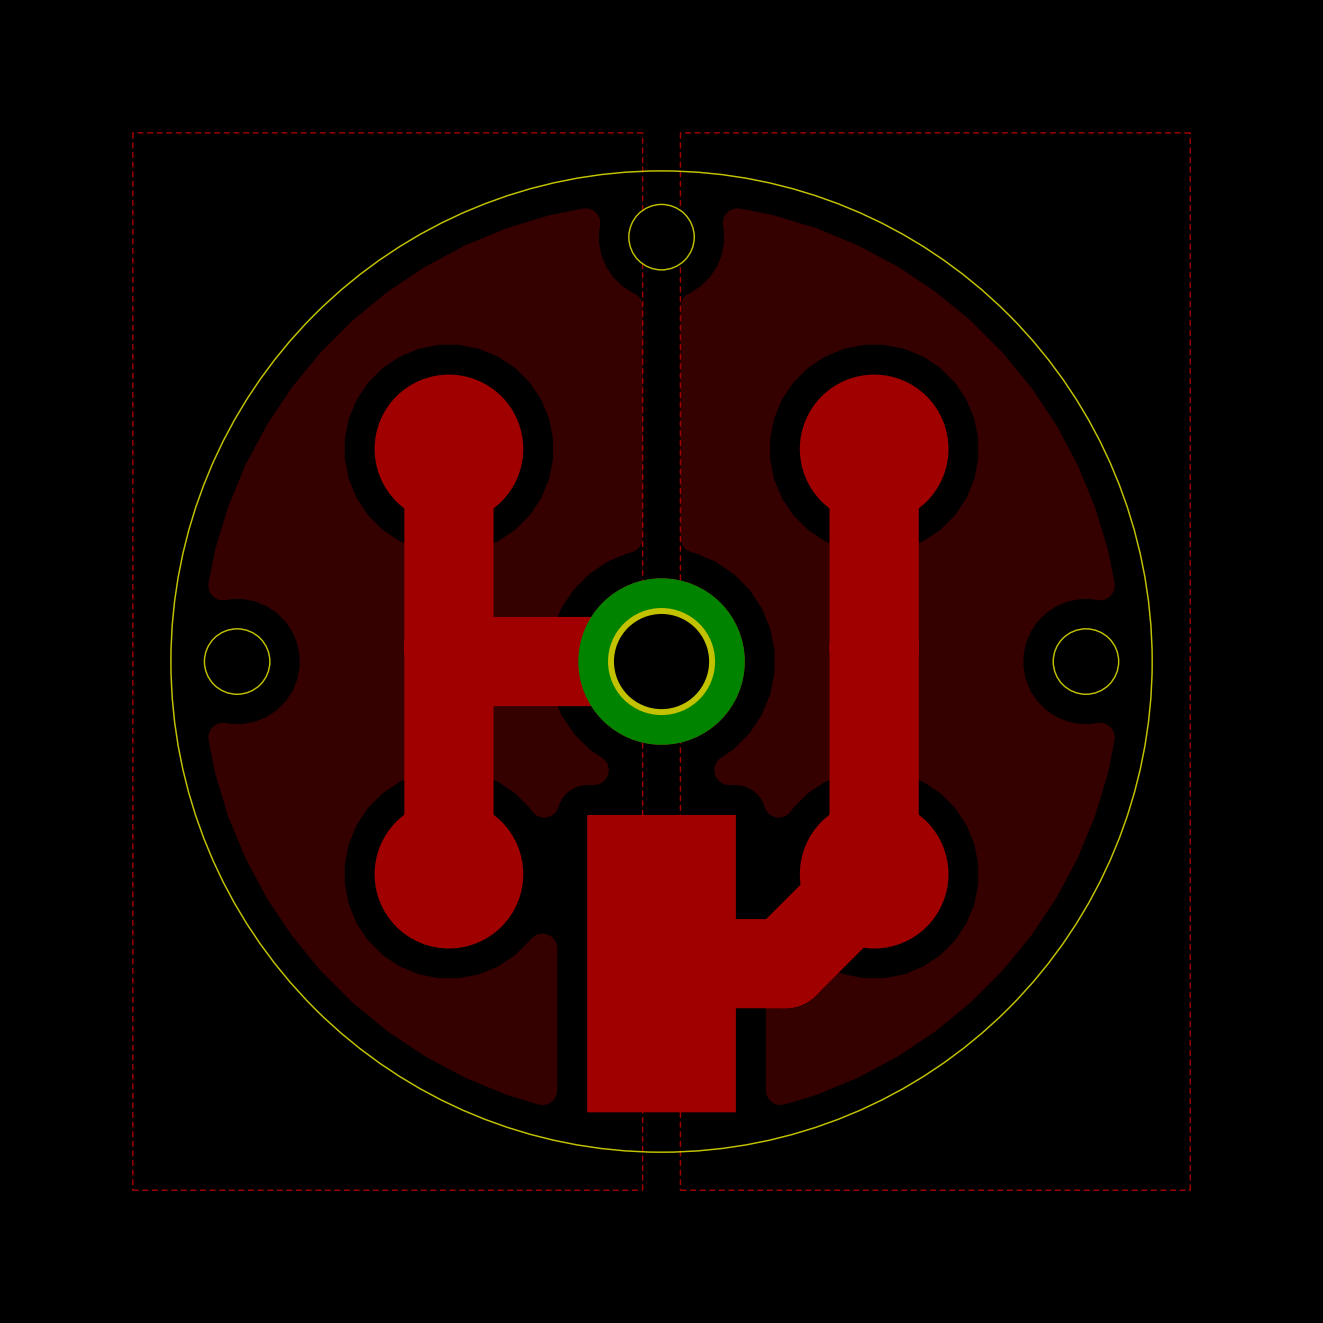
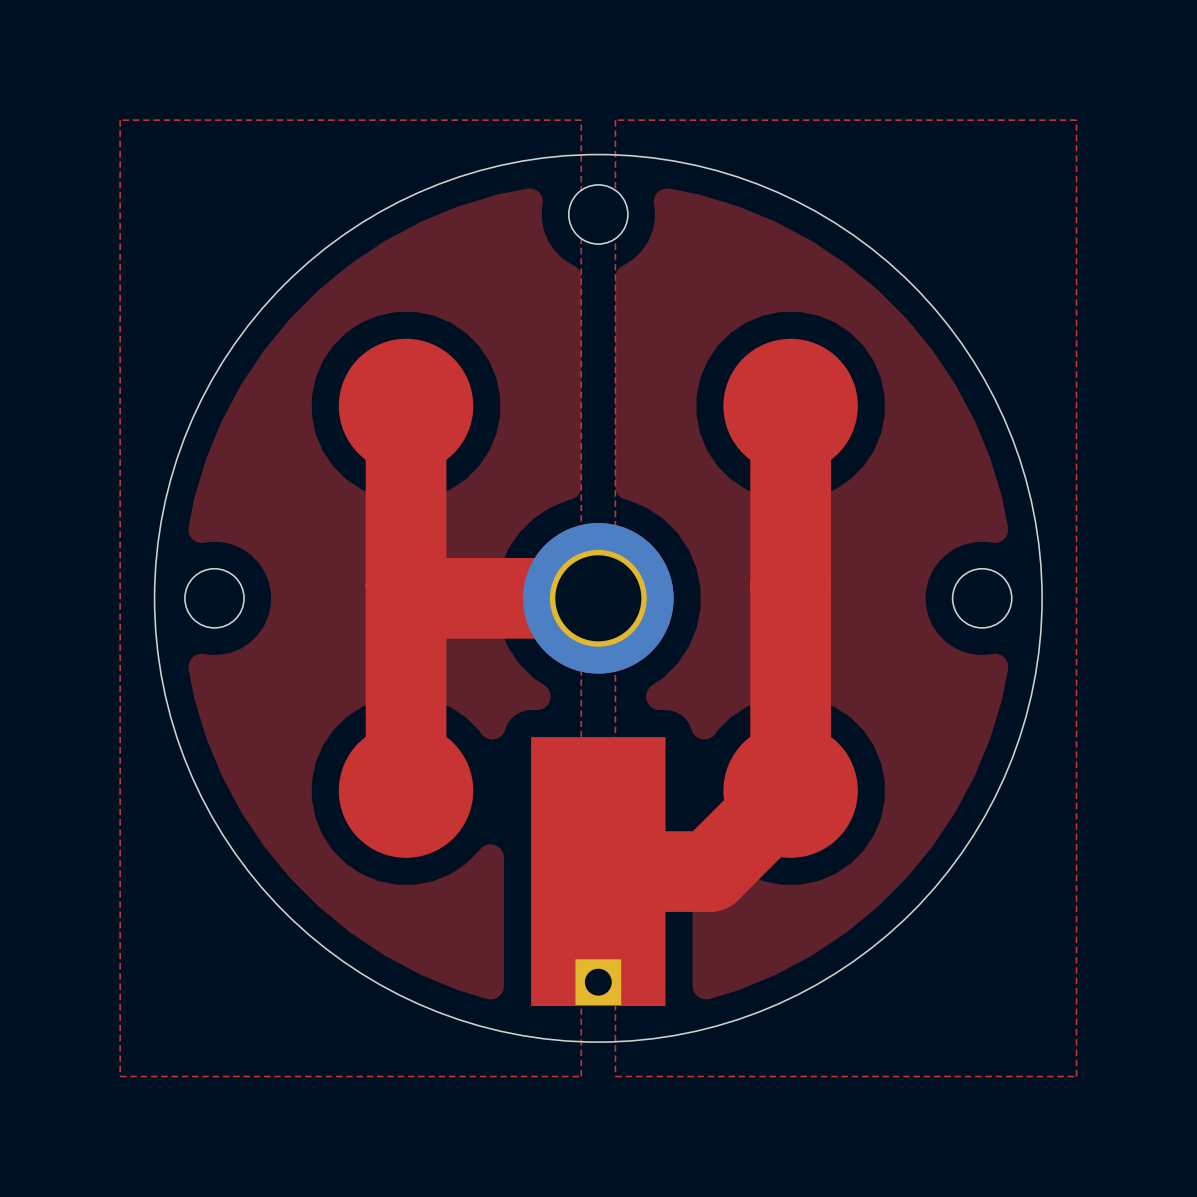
part: none -> (598, 982)

